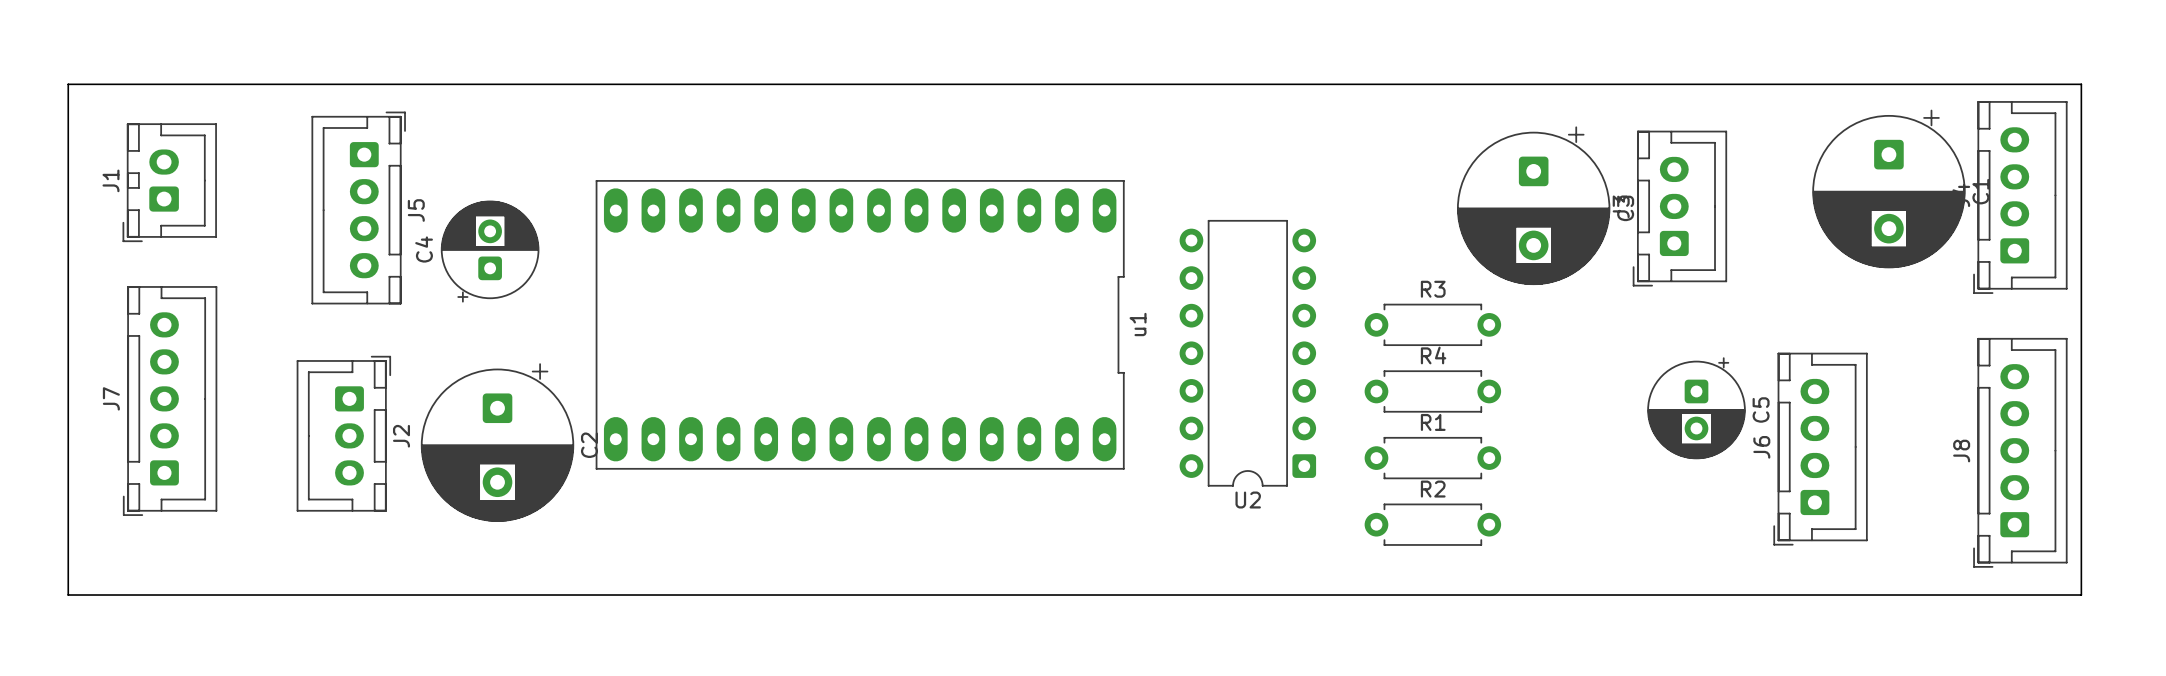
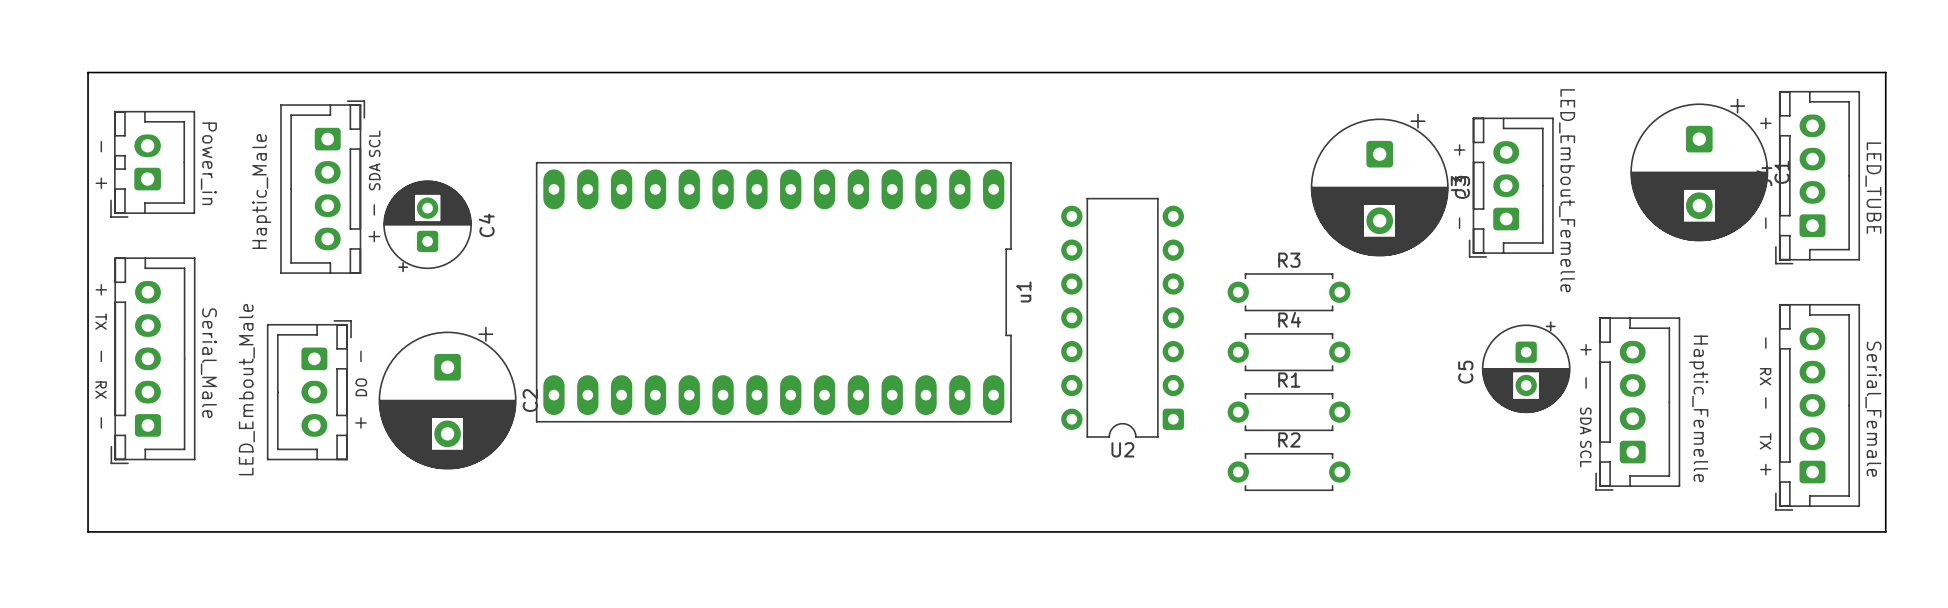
board edge: (68, 84) (2081, 84) (2081, 595) (68, 595) (68, 84) -> (88, 72) (88, 531) (1885, 531) (1885, 72) (88, 72)
text: none -> + (1765, 123)
text: none -> SCL (374, 143)
text: none -> - (101, 146)
text: none -> + (1459, 149)
J1 name: J1 (111, 180) -> none
text: none -> Power_in (208, 163)
text: none -> SDA (374, 176)
text: none -> + (101, 183)
text: none -> LED_TUBE (1873, 188)
J5 name: J5 (416, 210) -> none
text: none -> Haptic_Male (261, 191)
text: none -> LED_Embout_Femelle (1567, 190)
text: none -> - (374, 209)
text: none -> - (1459, 223)
text: none -> - (1765, 223)
C4 name position: C4 (424, 249) -> C4 (486, 225)
C4 position: (490, 251) -> (427, 226)
text: none -> + (374, 236)
text: none -> + (101, 289)
text: none -> TX (101, 321)
text: none -> - (1765, 343)
text: none -> + (1586, 349)
text: none -> - (101, 356)
text: none -> - (360, 356)
J7 name: J7 (111, 398) -> none
text: none -> Serial_Male (208, 363)
C5 name position: C5 (1761, 409) -> C5 (1465, 372)
text: none -> RX (1765, 376)
text: none -> - (1586, 383)
text: none -> DO (361, 387)
text: none -> RX (101, 390)
text: none -> LED_Embout_Male (246, 389)
J2 name: J2 (401, 436) -> none
J6 name: J6 (1761, 447) -> none
text: none -> - (1765, 402)
J8 name: J8 (1961, 451) -> none
text: none -> Haptic_Femelle (1698, 408)
text: none -> Serial_Female (1873, 409)
text: none -> SDA (1585, 421)
text: none -> - (101, 422)
text: none -> + (360, 422)
text: none -> TX (1765, 441)
text: none -> SCL (1585, 454)
text: none -> + (1765, 469)

